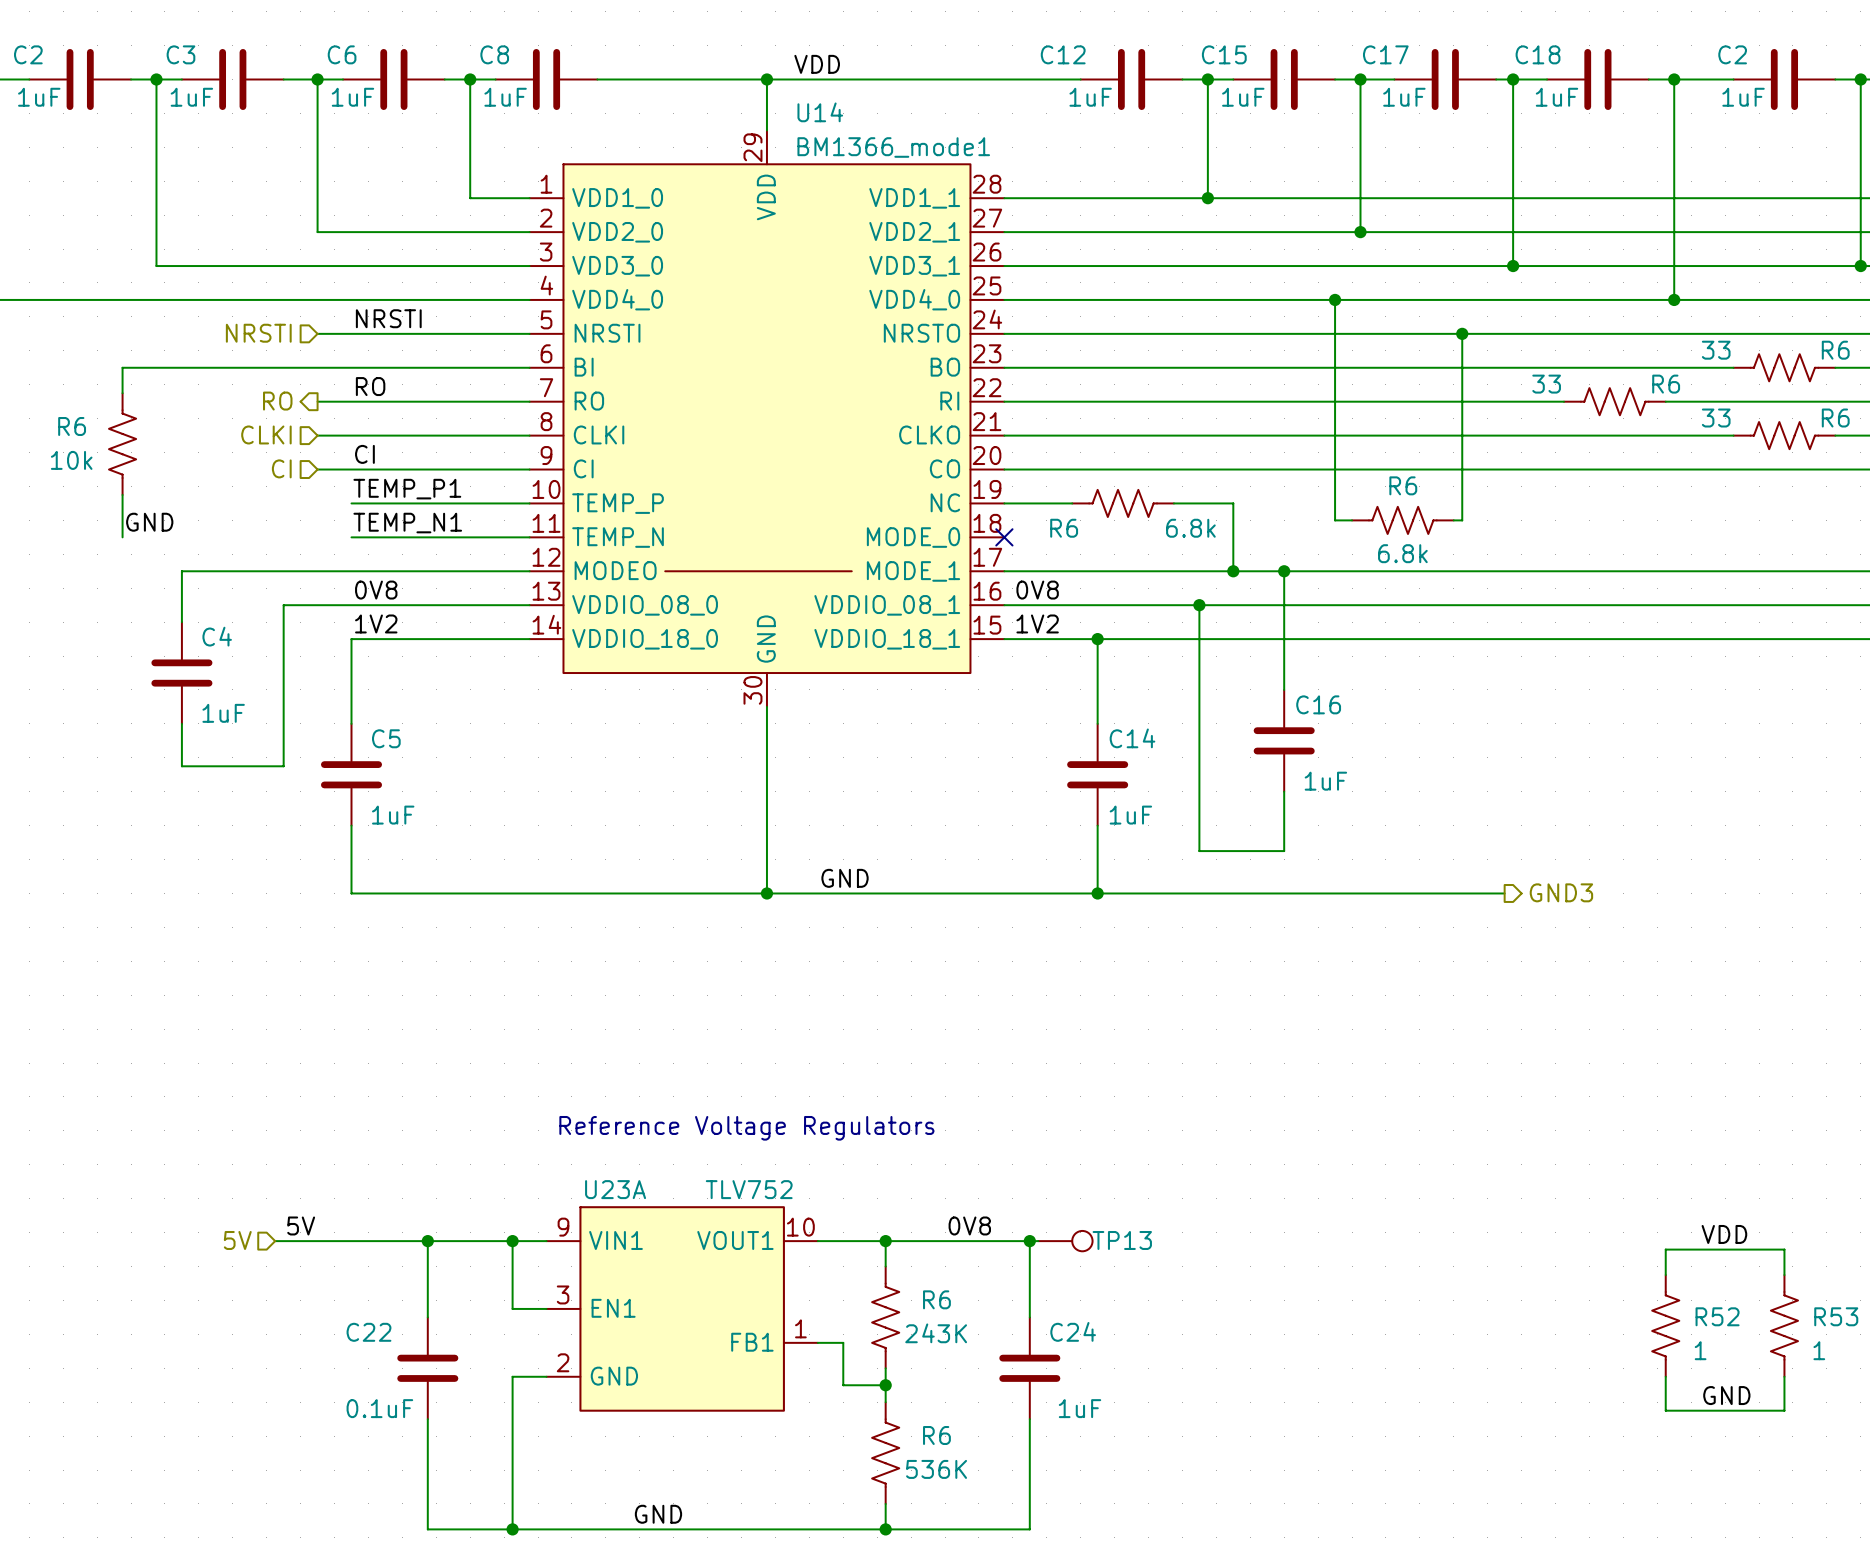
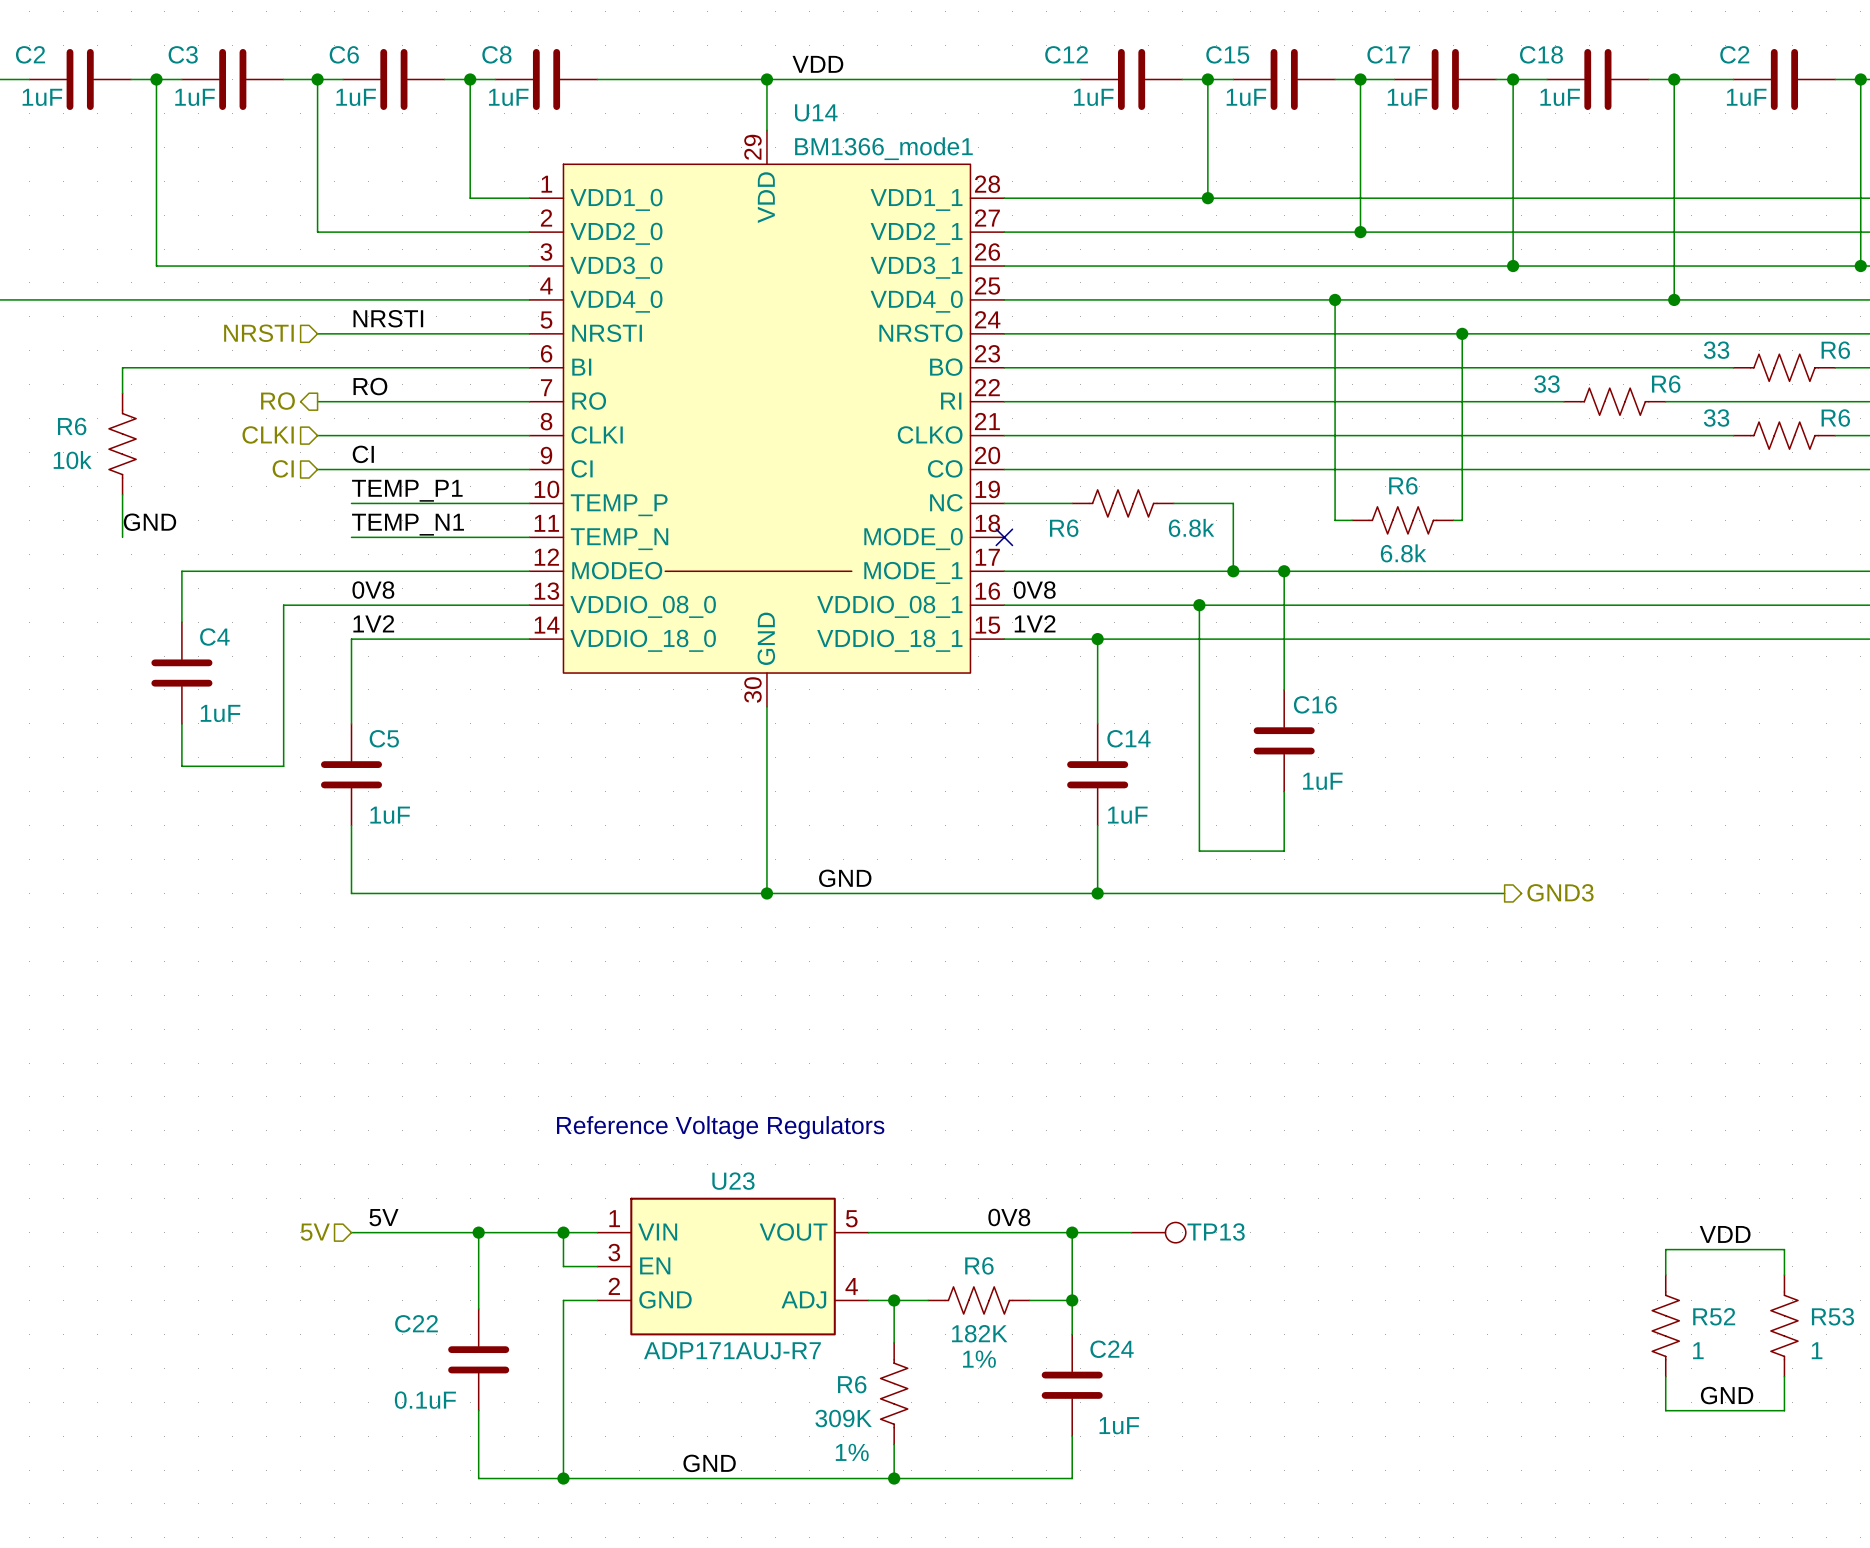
label position: 5V (301, 1225) -> 5V (383, 1217)
label position: 0V8 (969, 1225) -> 0V8 (1009, 1217)
wire: none -> (351, 1232) (597, 1232)
junction: none -> (478, 1232)
wire: none -> (563, 1232) (563, 1266) (597, 1266)
junction: none -> (563, 1232)
wire: none -> (868, 1232) (1131, 1232)
wire: none -> (1072, 1232) (1072, 1334)
junction: none -> (1072, 1232)
hierarchical label position: 5V (237, 1240) -> 5V (315, 1232)
wire: (275, 1241) (546, 1241) -> none
wire: (427, 1241) (427, 1317) -> (478, 1232) (478, 1308)
junction: (427, 1241) -> none
wire: (512, 1241) (512, 1308) (546, 1308) -> none
junction: (512, 1241) -> none
wire: (817, 1241) (1038, 1241) -> none
wire: (885, 1241) (885, 1266) -> none
junction: (885, 1241) -> none
wire: (1029, 1241) (1029, 1317) -> none
junction: (1029, 1241) -> none
TP13 position: (1065, 1241) -> (1158, 1232)
U23: none -> ADP171AUJ-R7 (733, 1266)
wire: none -> (597, 1300) (563, 1300) (563, 1478)
wire: none -> (868, 1300) (928, 1300)
wire: none -> (894, 1300) (894, 1342)
junction: none -> (894, 1300)
R6: none -> 182K (978, 1300)
wire: none -> (1029, 1300) (1072, 1300)
junction: none -> (1072, 1300)
U23A: TLV752 (682, 1308) -> none
R6: 243K (885, 1317) -> none
wire: (817, 1342) (843, 1342) (843, 1385) (885, 1385) -> none
C22 position: (427, 1368) -> (478, 1359)
wire: (885, 1368) (885, 1402) -> (894, 1444) (894, 1478)
C24 position: (1029, 1368) -> (1072, 1385)
wire: (546, 1376) (512, 1376) (512, 1529) -> none
junction: (885, 1385) -> none
R6: none -> 309K (894, 1393)
wire: none -> (478, 1410) (478, 1478) (1072, 1478) (1072, 1436)
wire: (427, 1419) (427, 1529) (1029, 1529) (1029, 1419) -> none
R6: 536K (885, 1453) -> none
junction: none -> (894, 1478)
wire: (885, 1503) (885, 1529) -> none
label position: GND (658, 1514) -> GND (709, 1463)
junction position: (512, 1529) -> (563, 1478)
junction: (885, 1529) -> none

